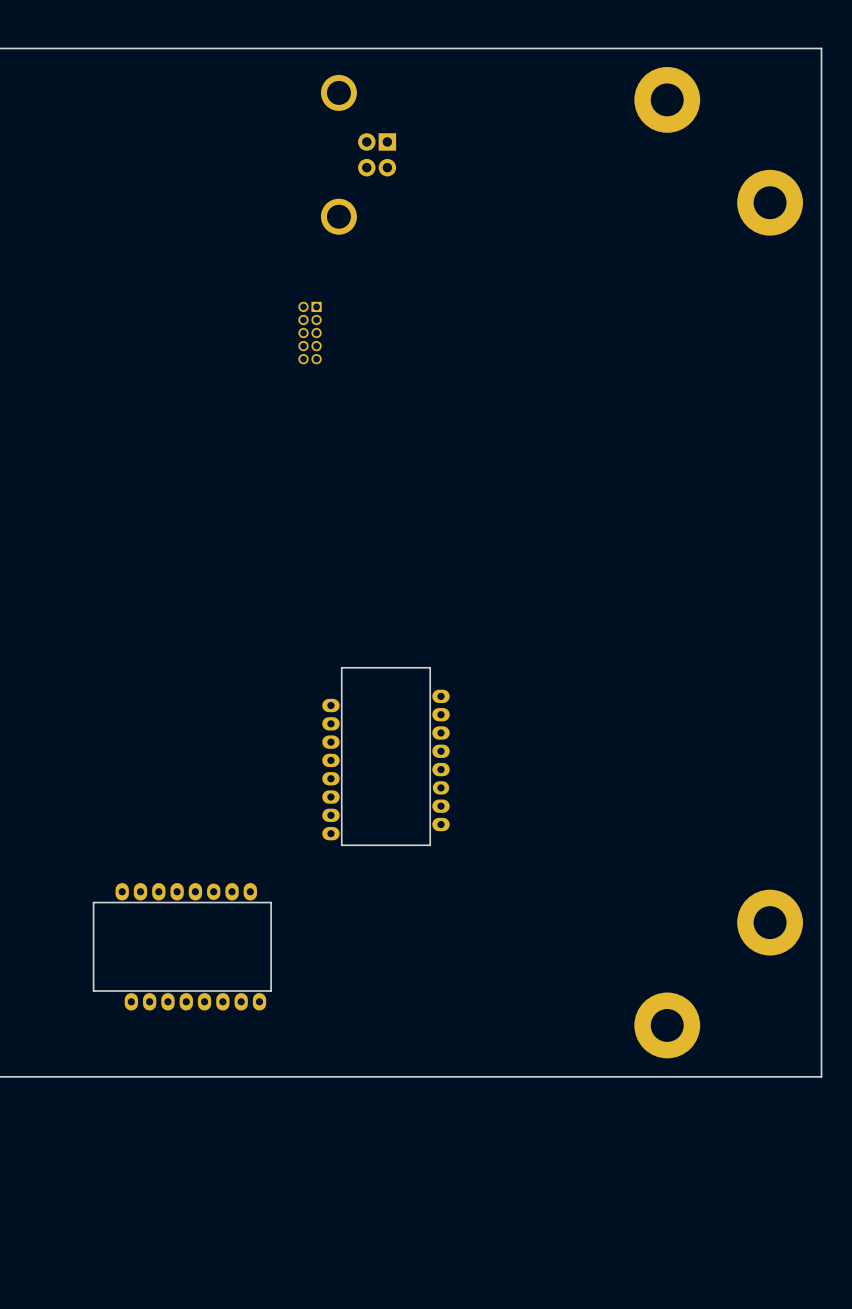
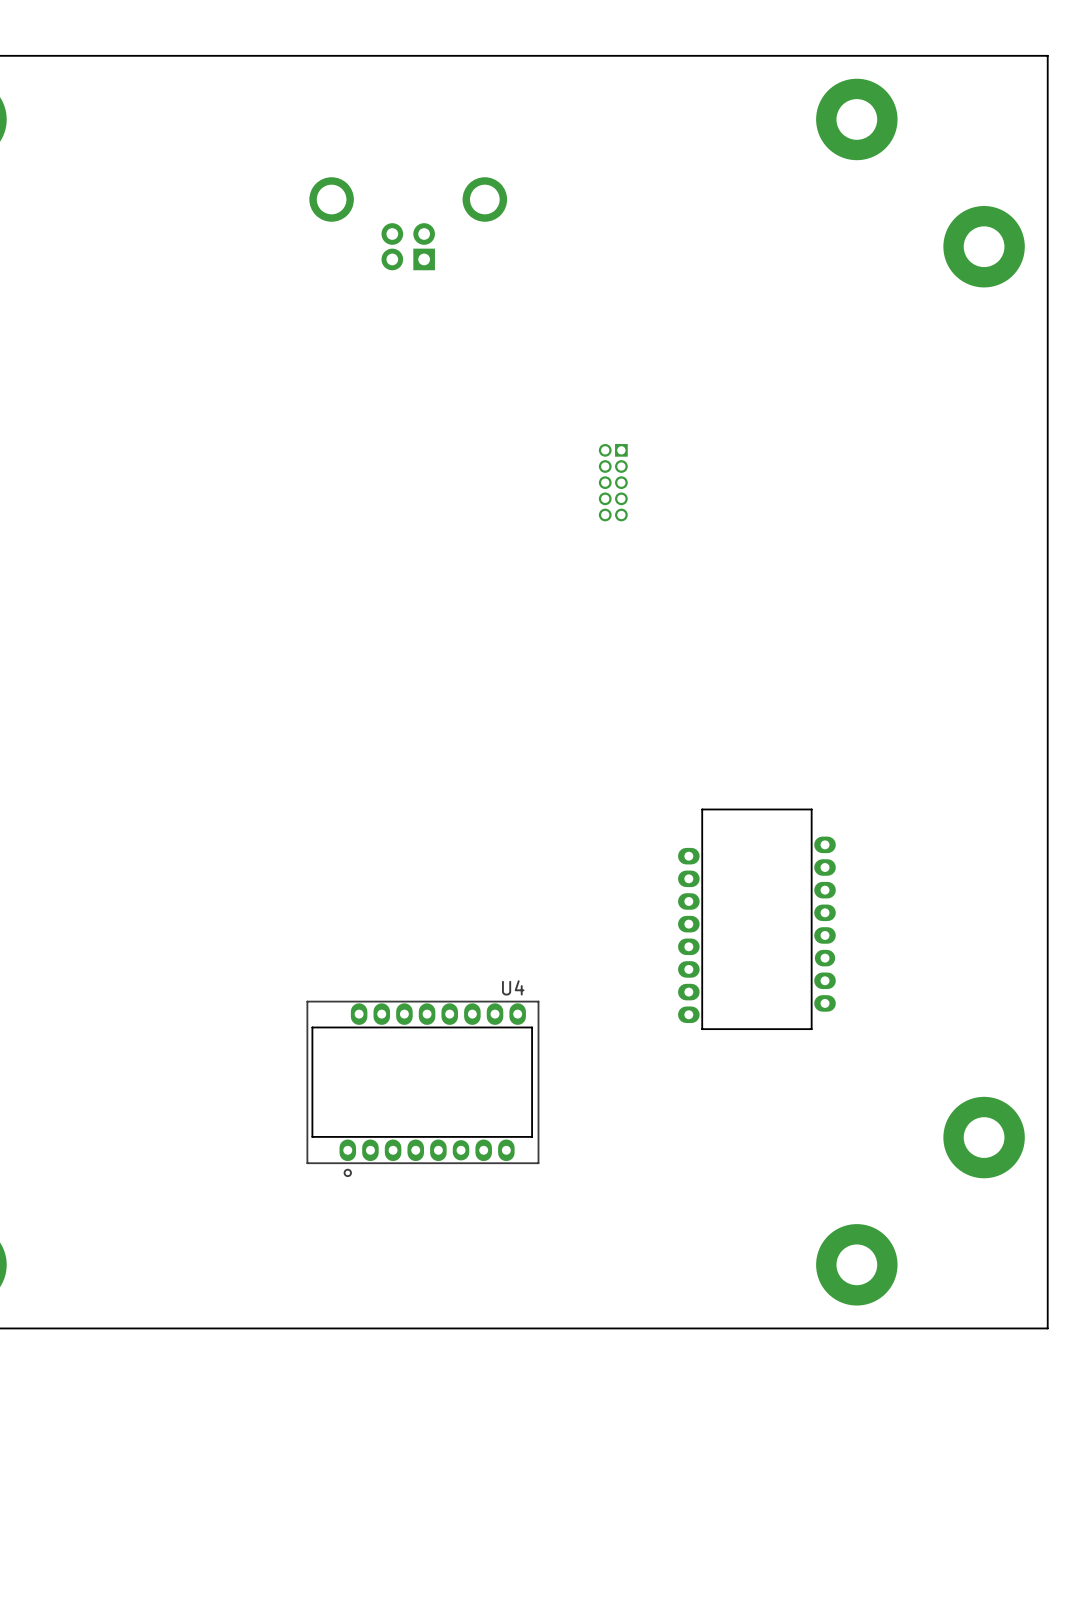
part rotation: 0° (358, 154) -> 90° clockwise (408, 223)
part position: (310, 333) -> (613, 482)
part position: (385, 756) -> (756, 919)
U4 side: top (182, 946) -> bottom (422, 1088)

